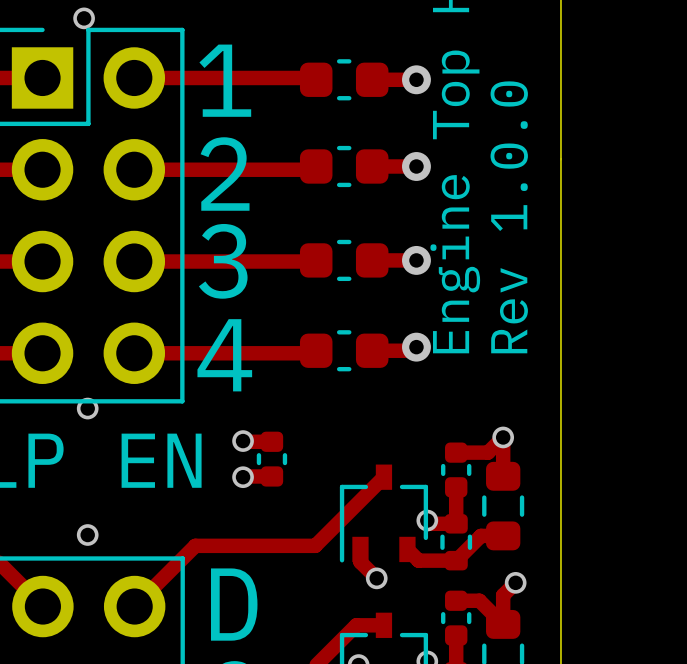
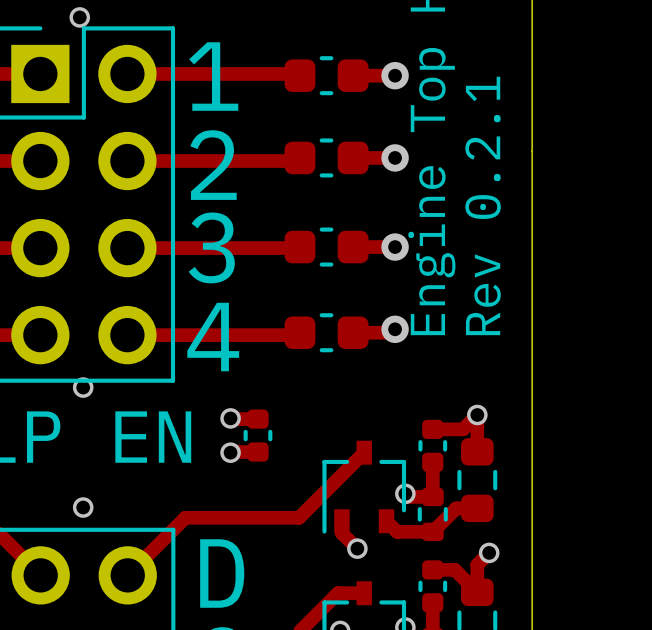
text: Rev 1.0.0 (509, 217) -> Rev 0.2.1 (483, 205)

